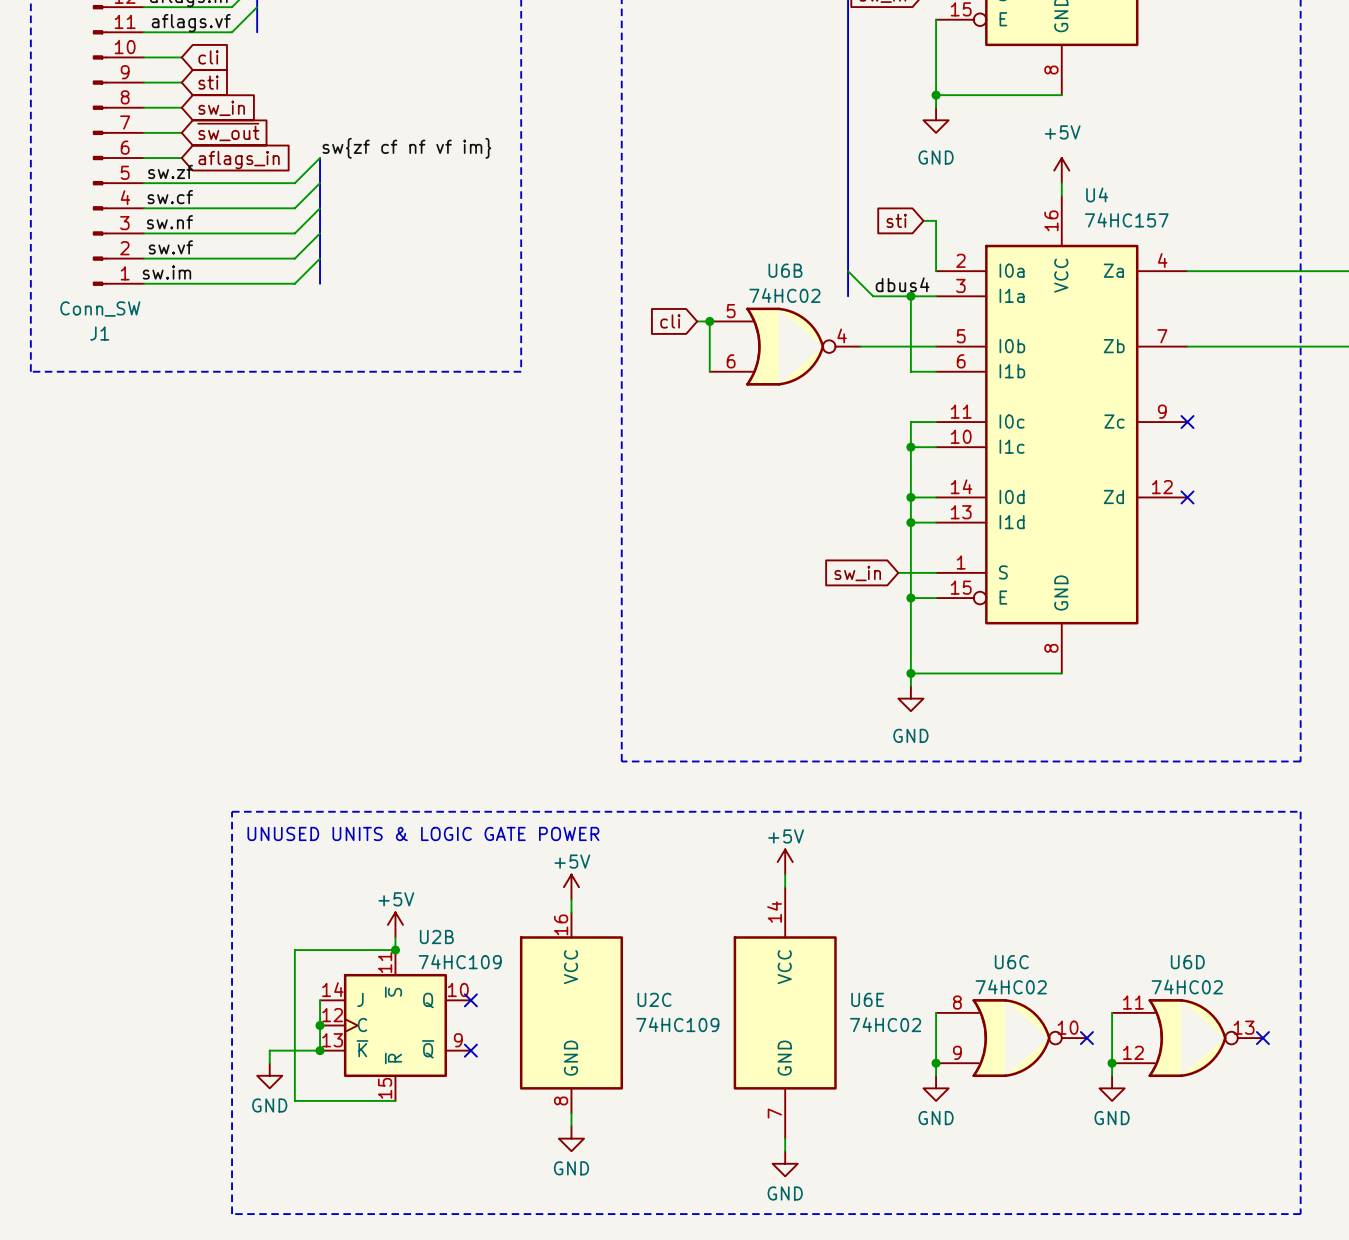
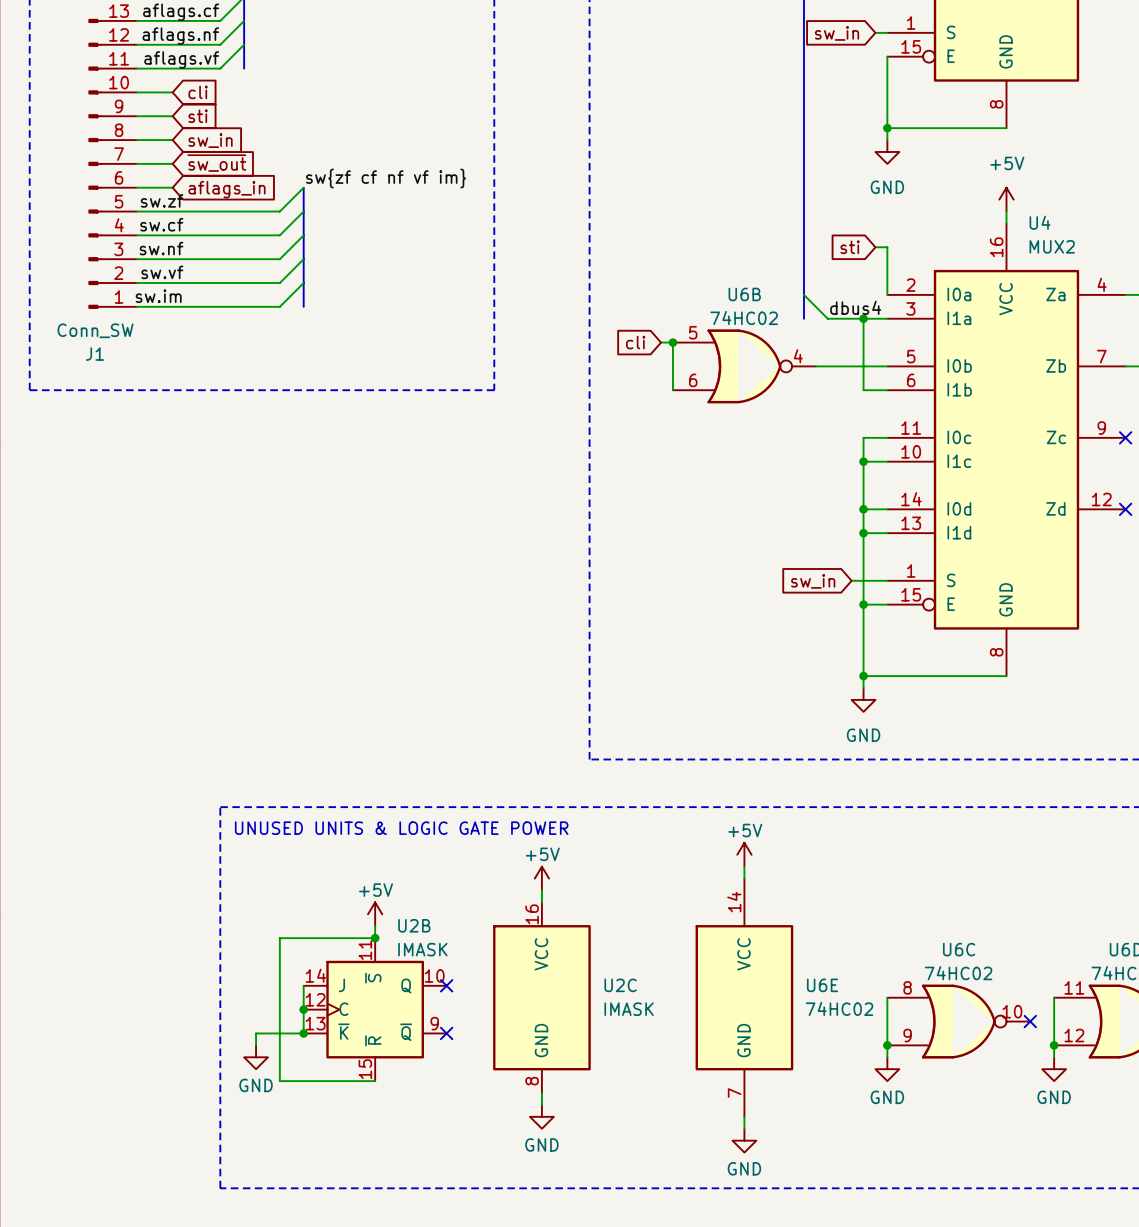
U4 value: 74HC157 (1126, 220) -> MUX2 (1052, 246)
U2B value: 74HC109 (460, 961) -> IMASK (422, 949)
U2C value: 74HC109 (677, 1024) -> IMASK (629, 1009)

